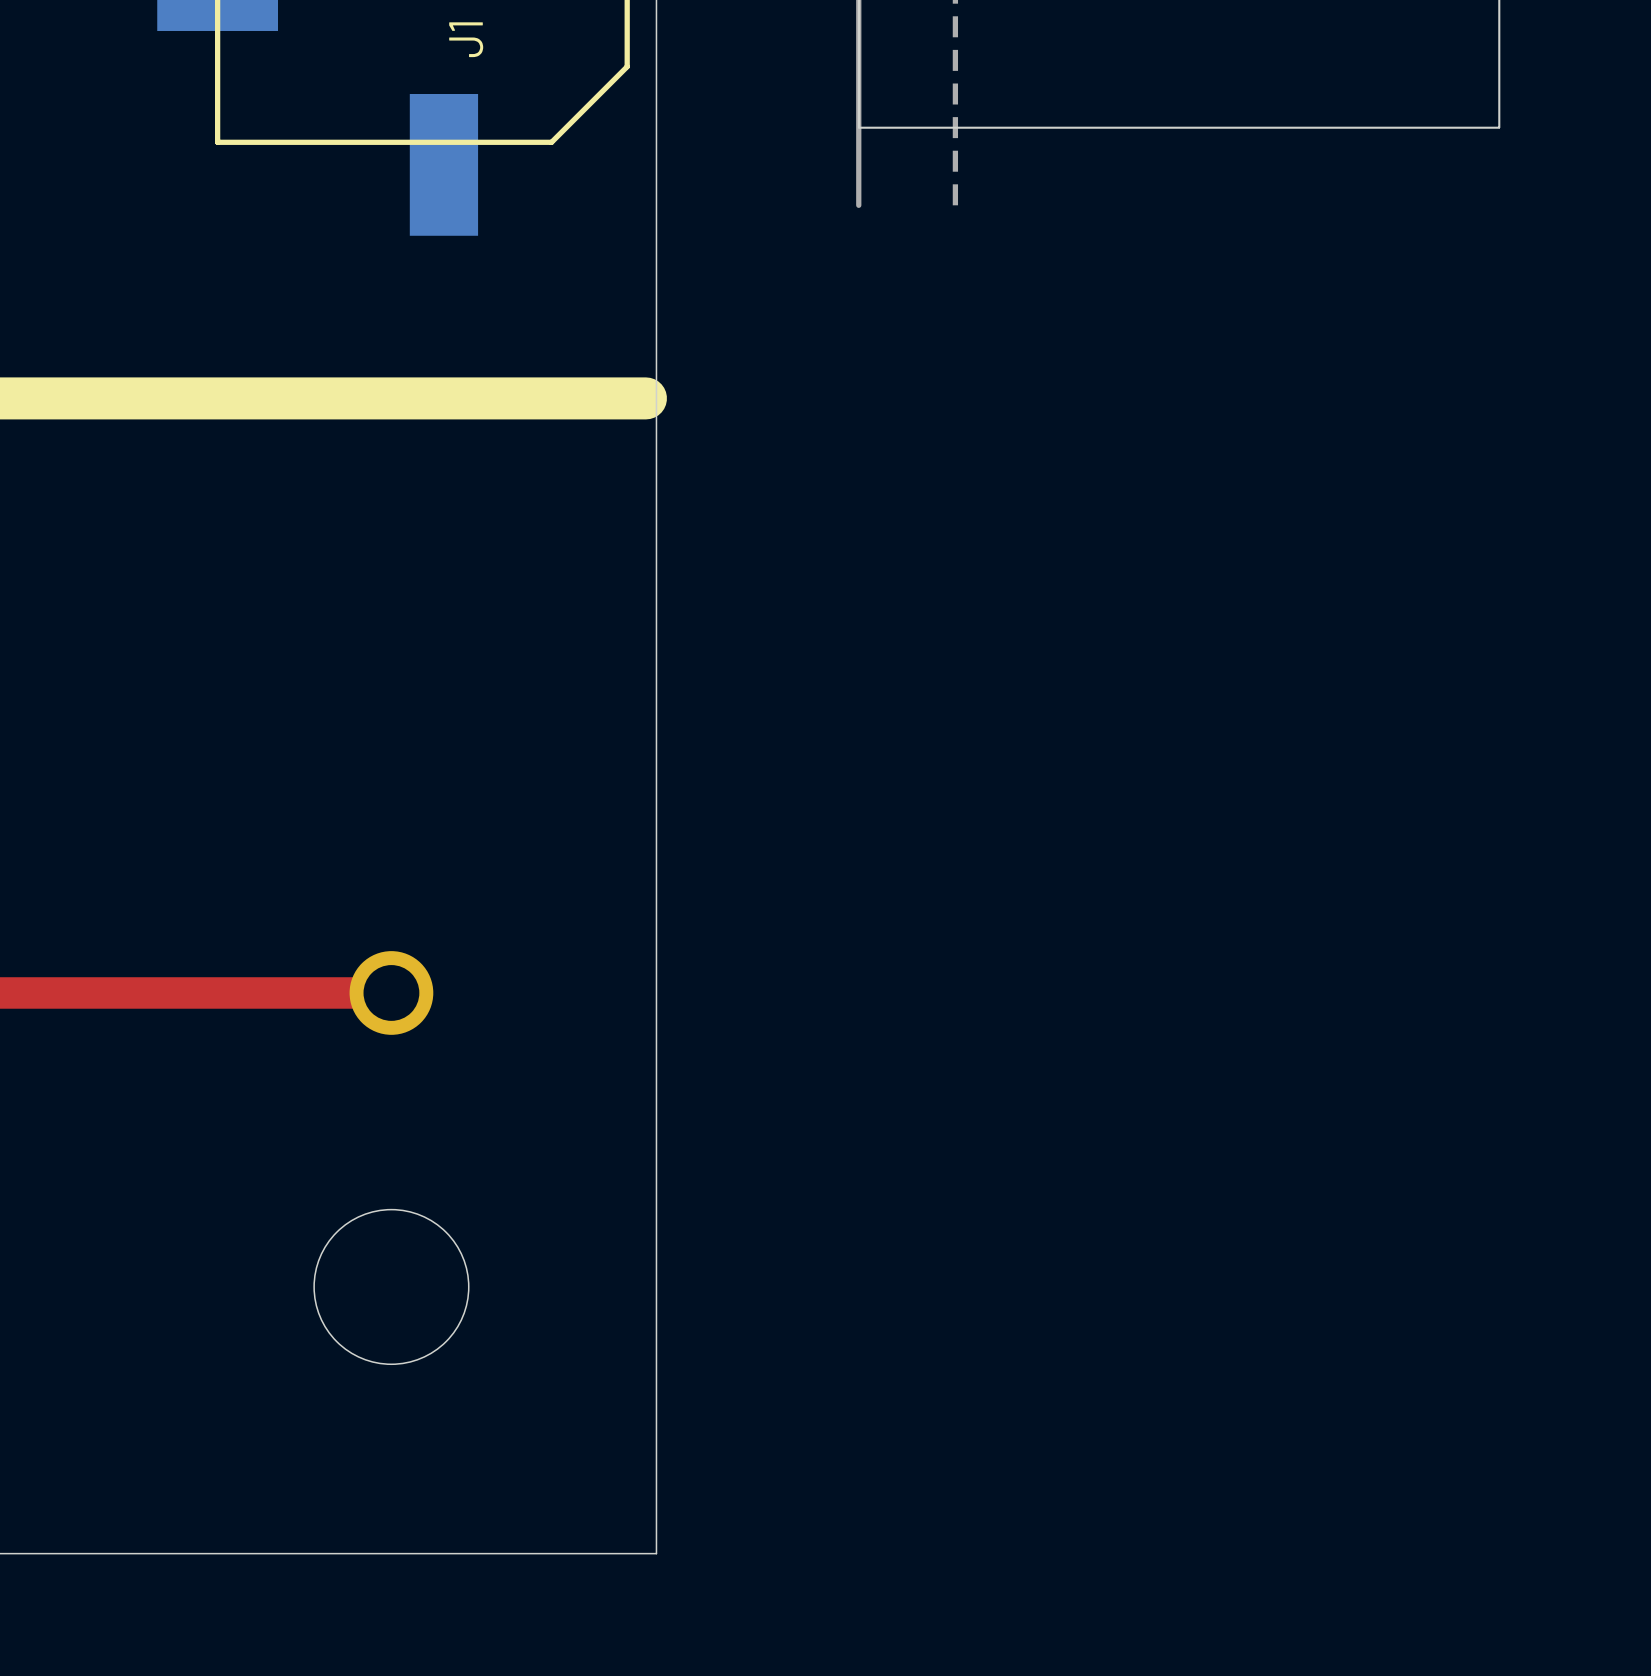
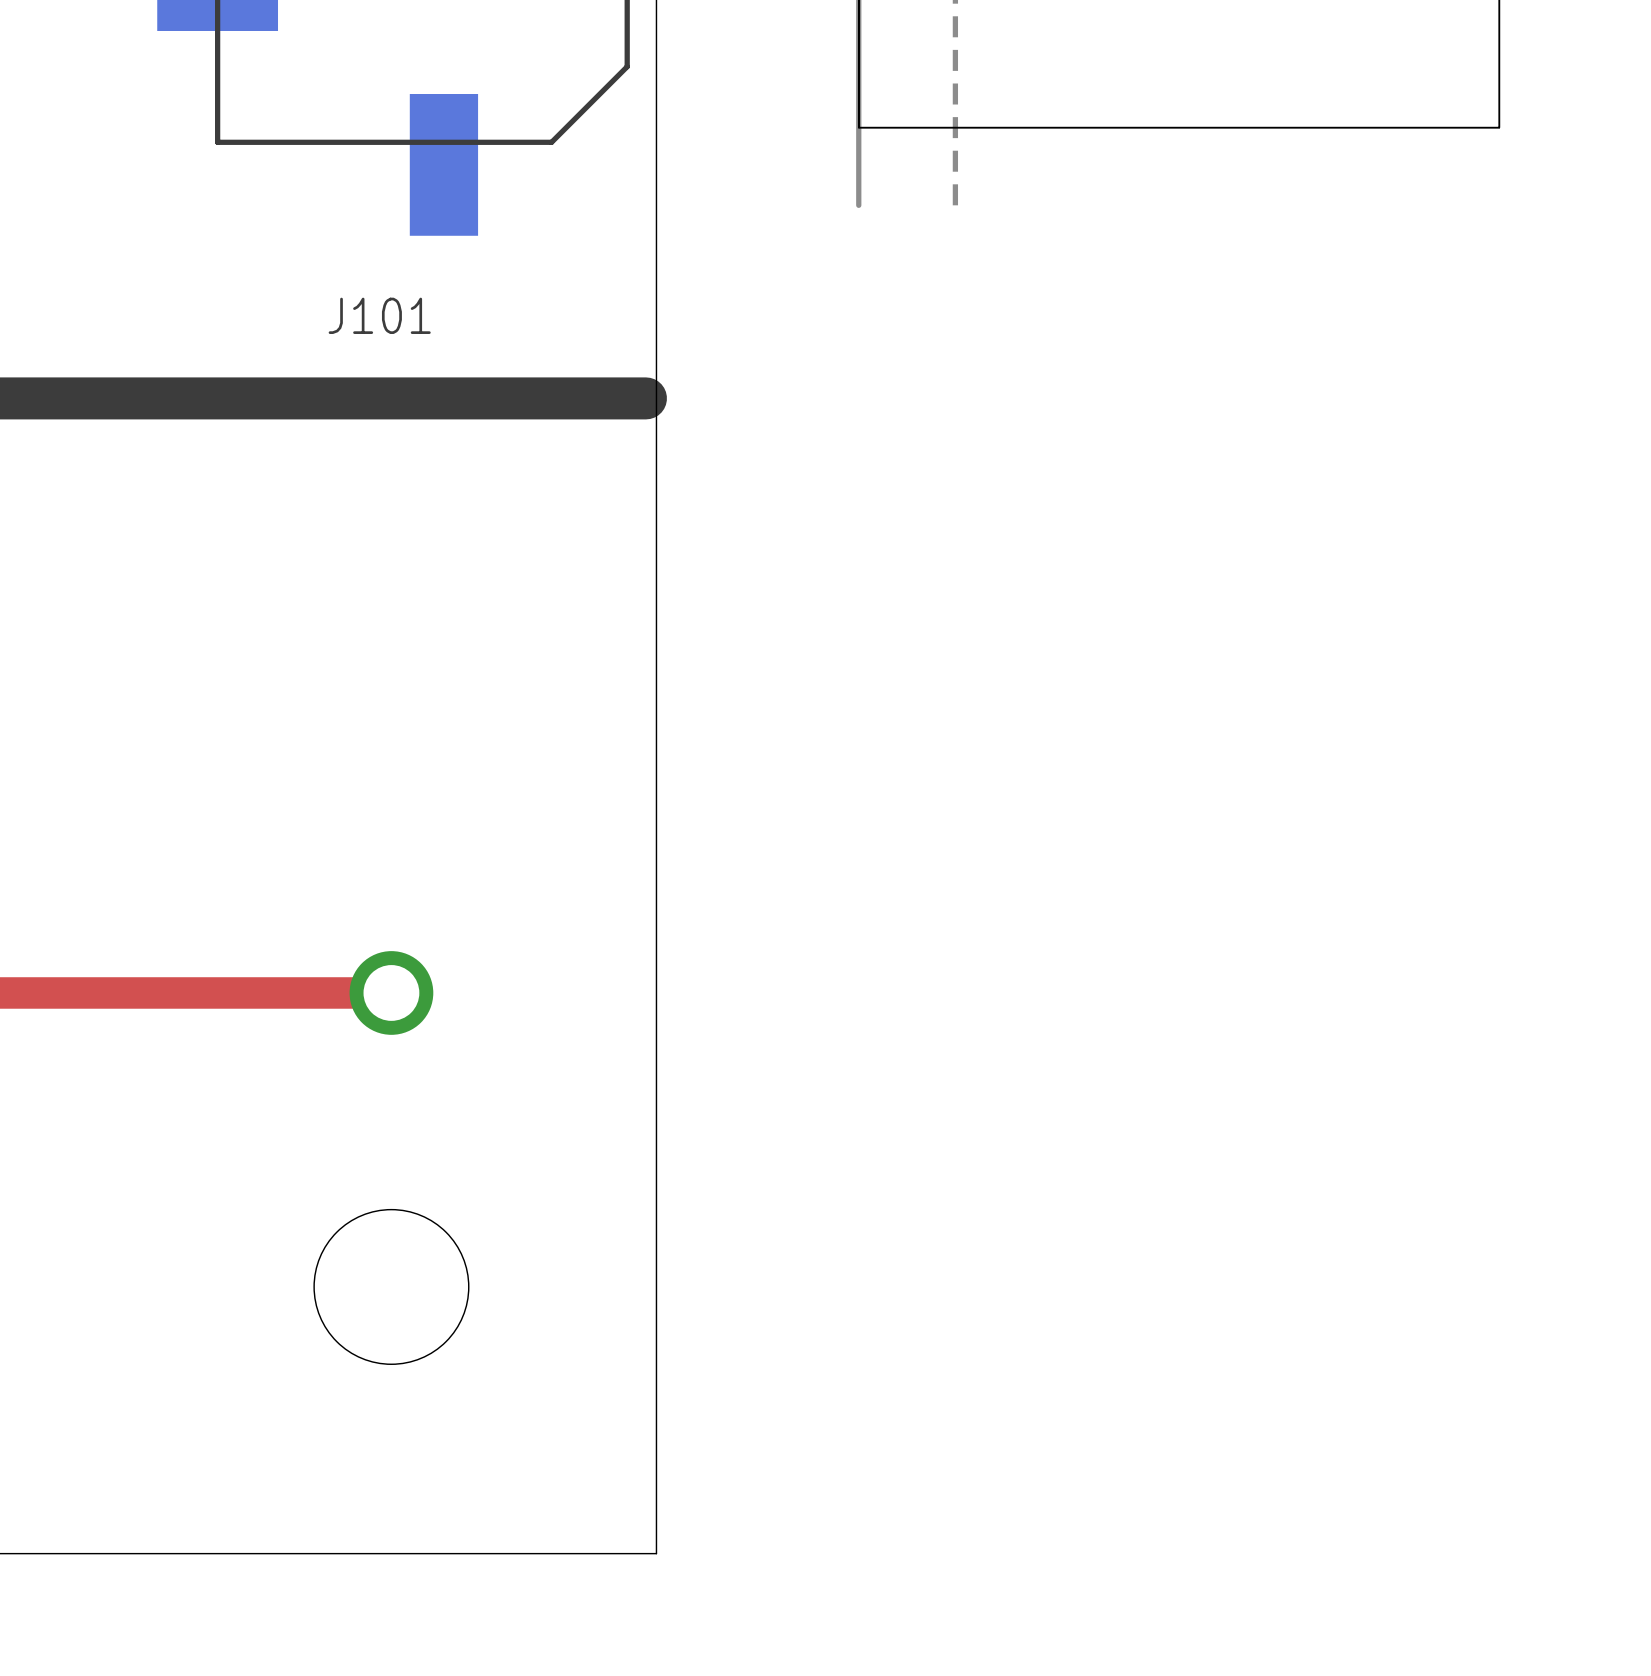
J1 name: J1 (466, 39) -> J101 (379, 315)

